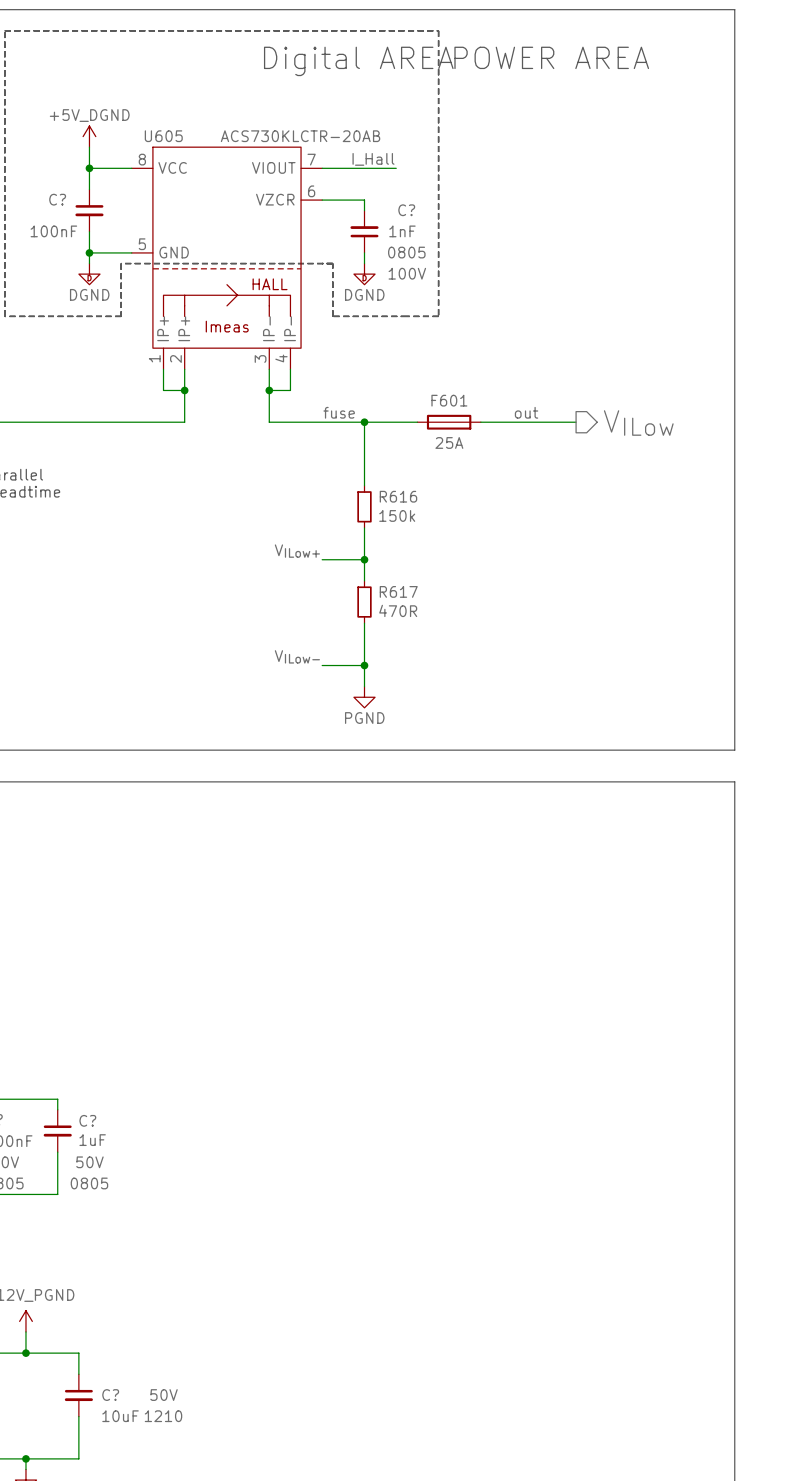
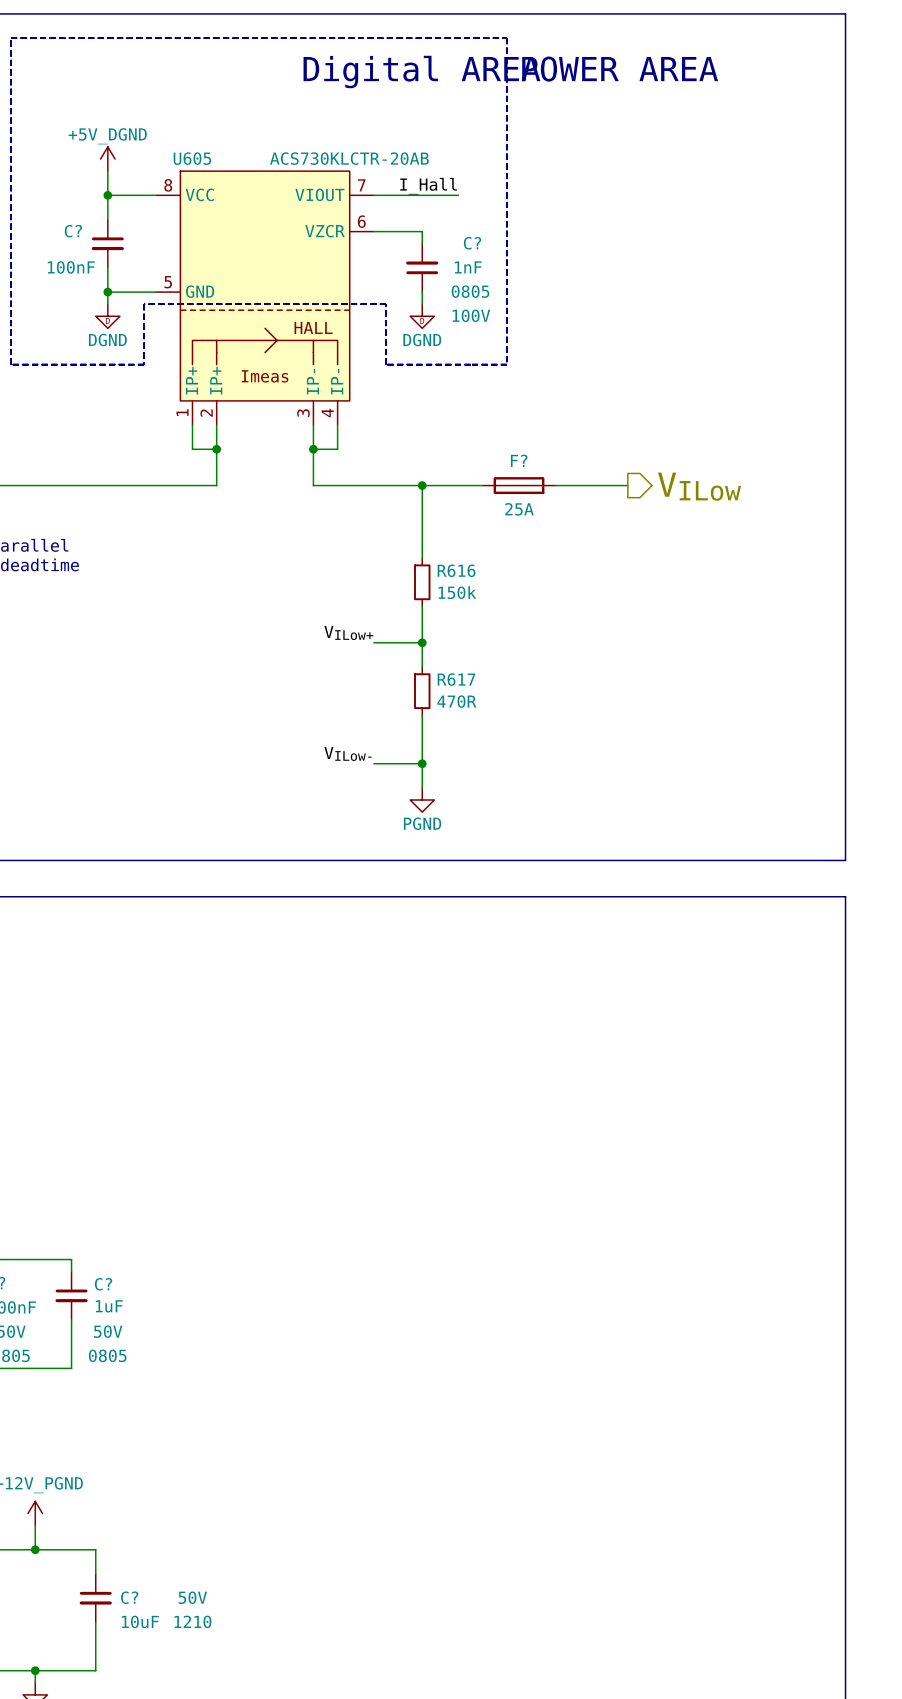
F601 name: F601 (449, 400) -> F? (519, 460)
label: fuse (339, 412) -> none
label: out (526, 412) -> none
wire: (544, 422) (576, 422) -> none
hierarchical label position: VILow (638, 423) -> VILow (699, 486)

